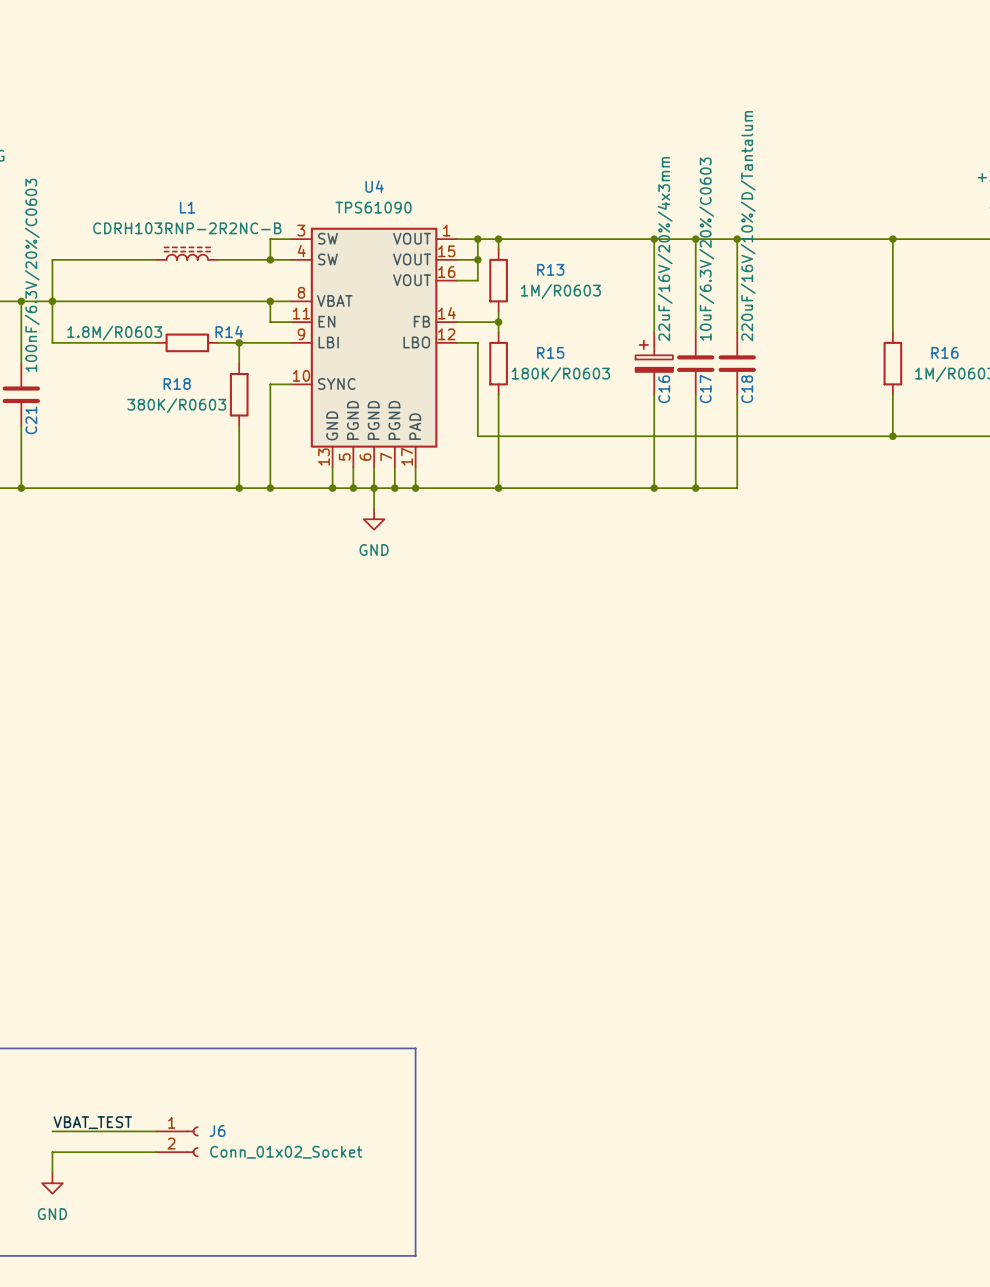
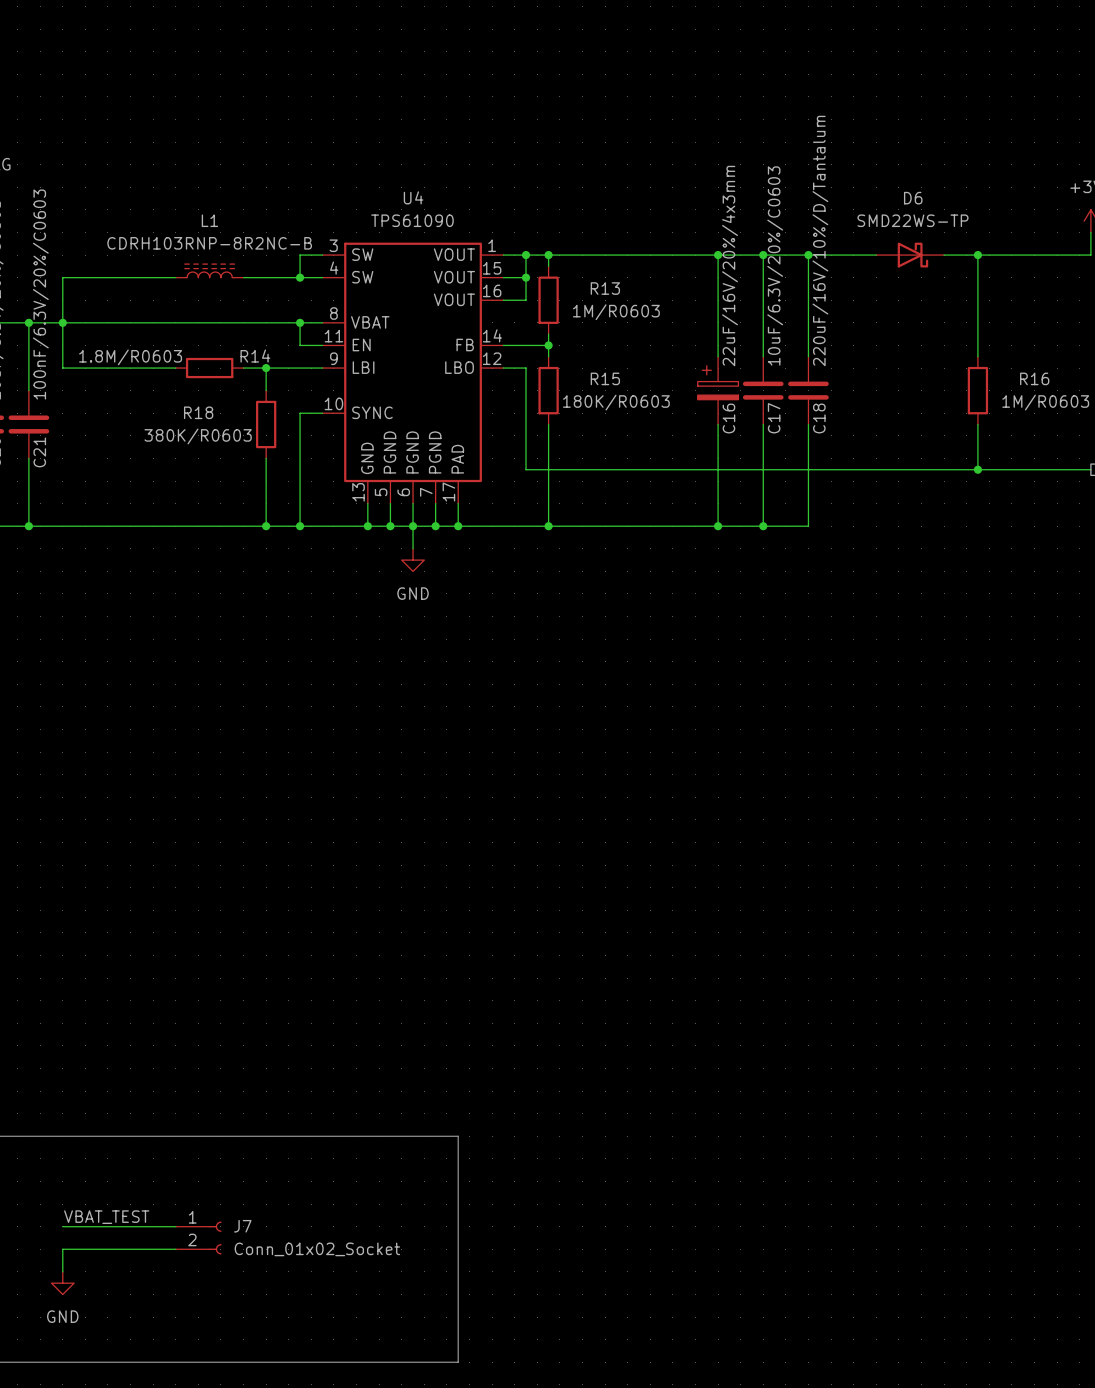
L1 value: CDRH103RNP-2R2NC-B (187, 228) -> CDRH103RNP-8R2NC-B (209, 243)
D6: none -> SMD22WS-TP (910, 255)
J6 name: J6 (217, 1131) -> J7 (242, 1226)

